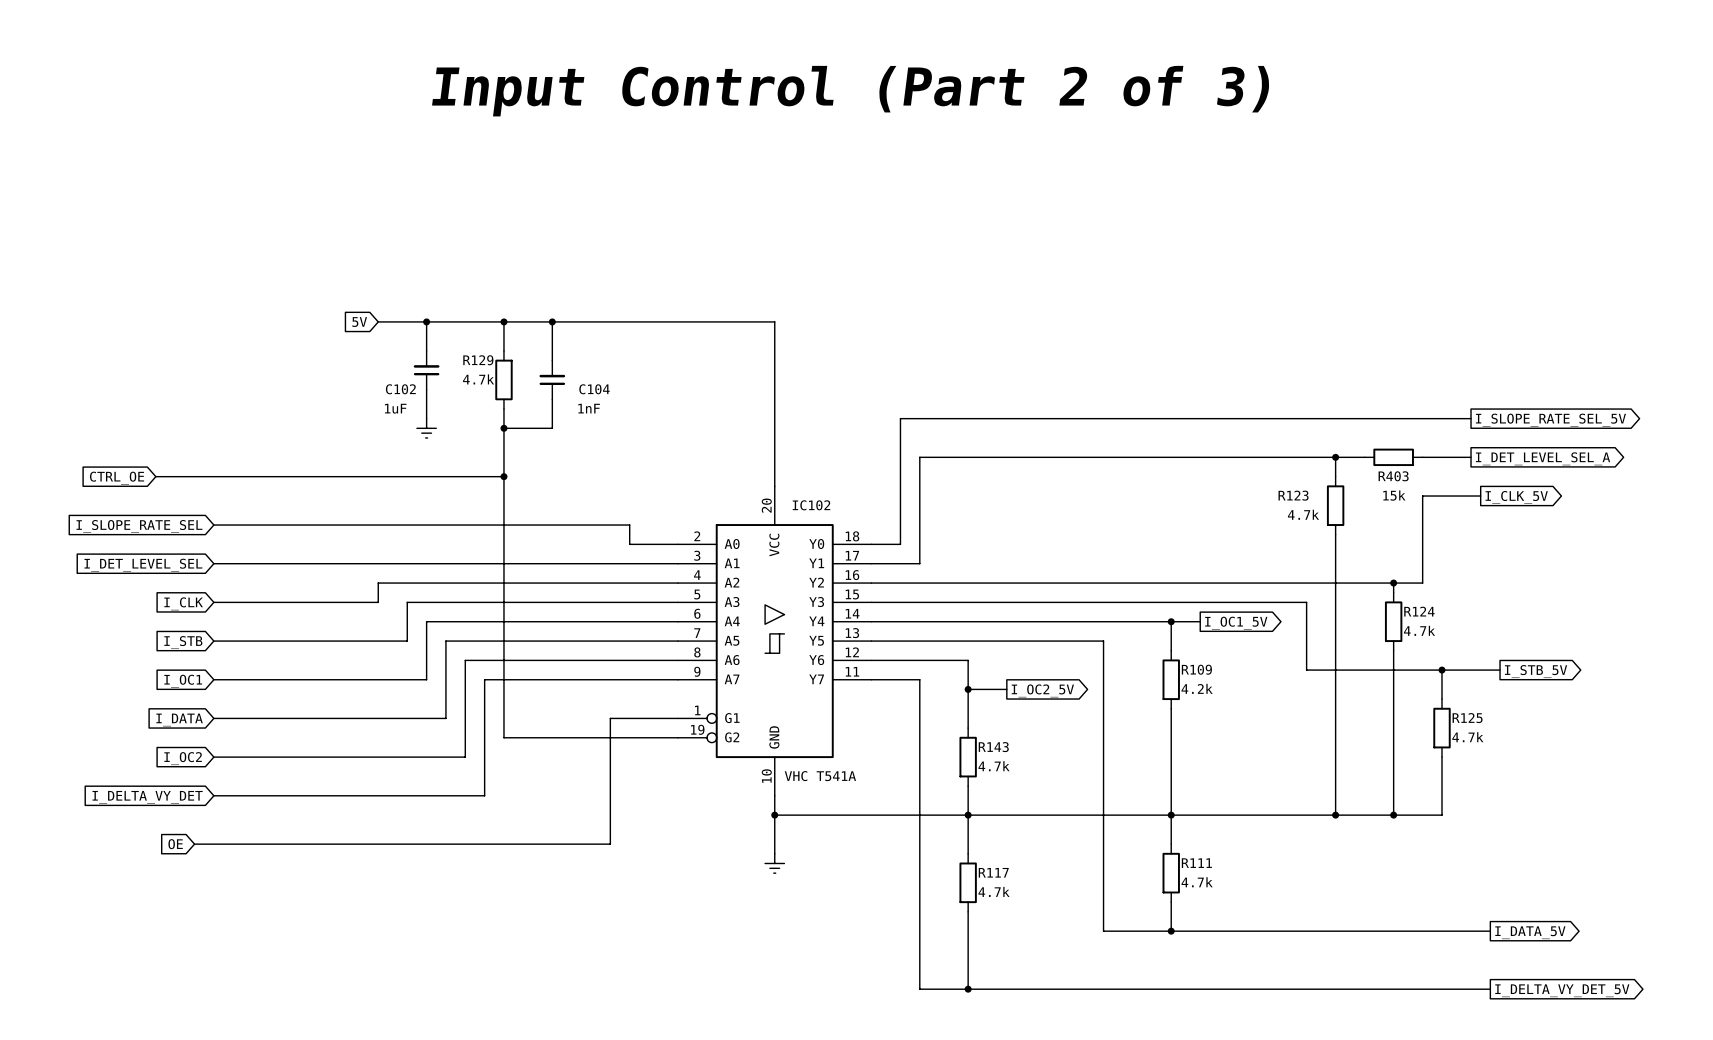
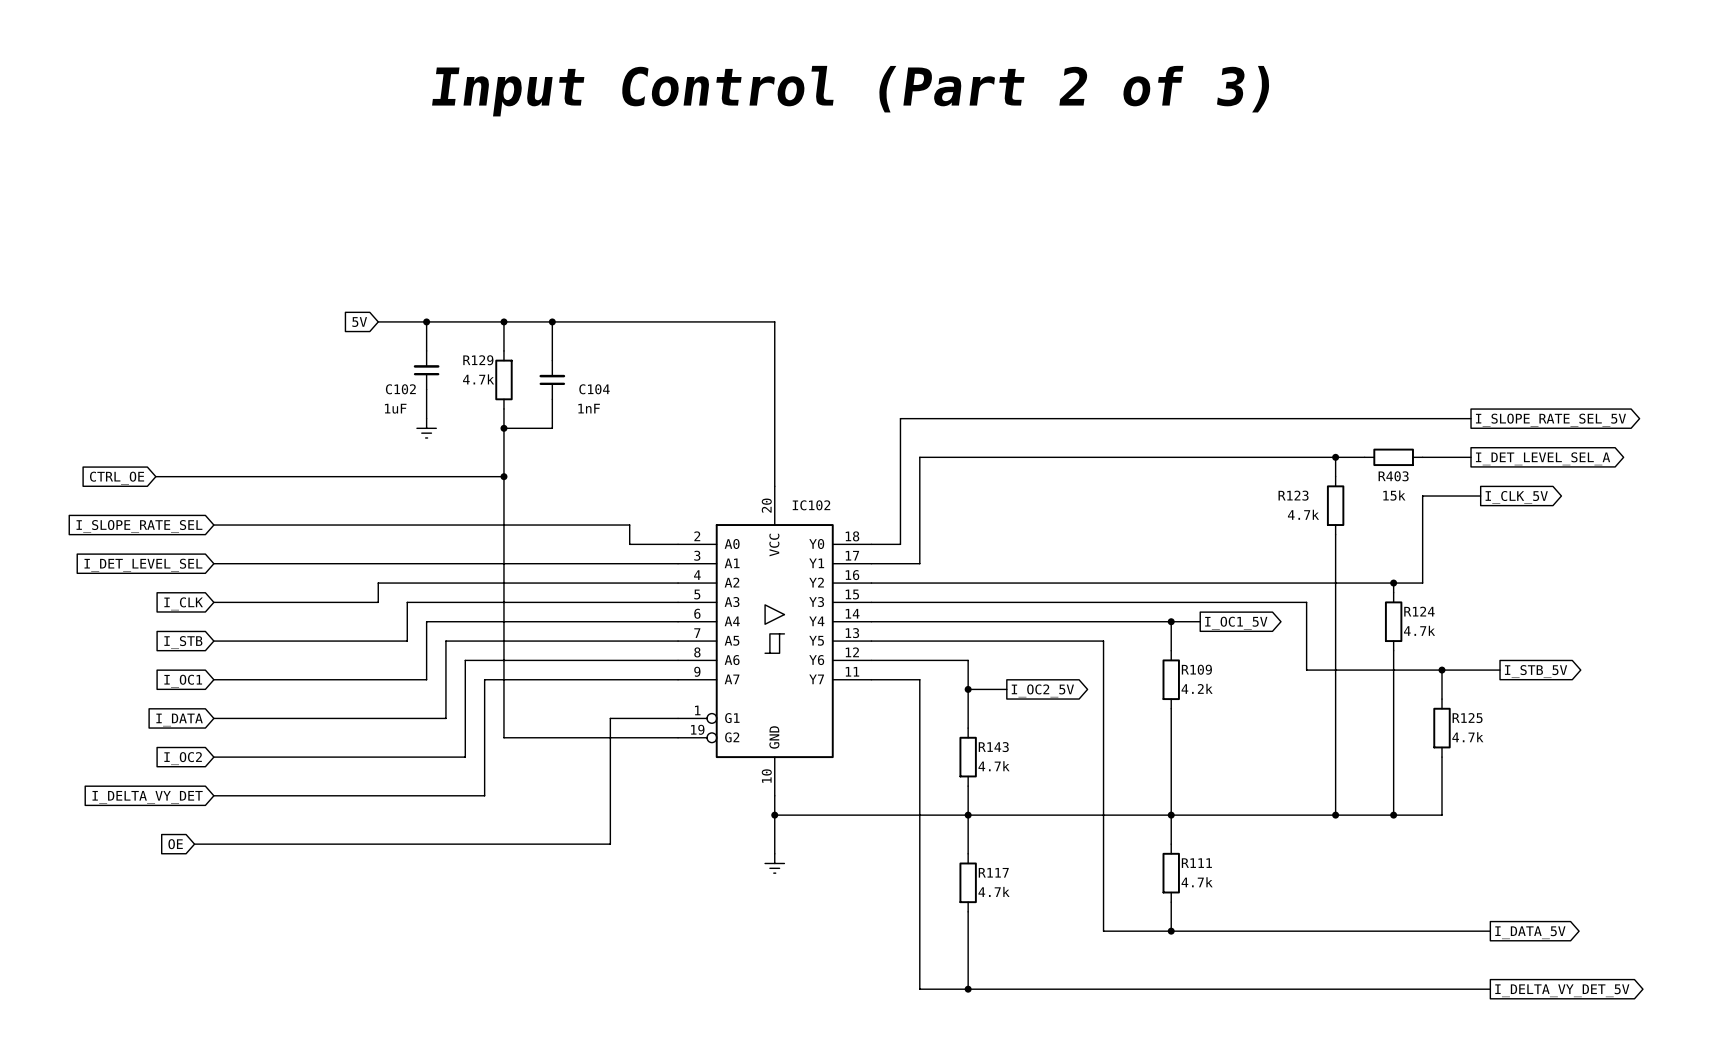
IC102 value: VHC T541A (820, 776) -> none

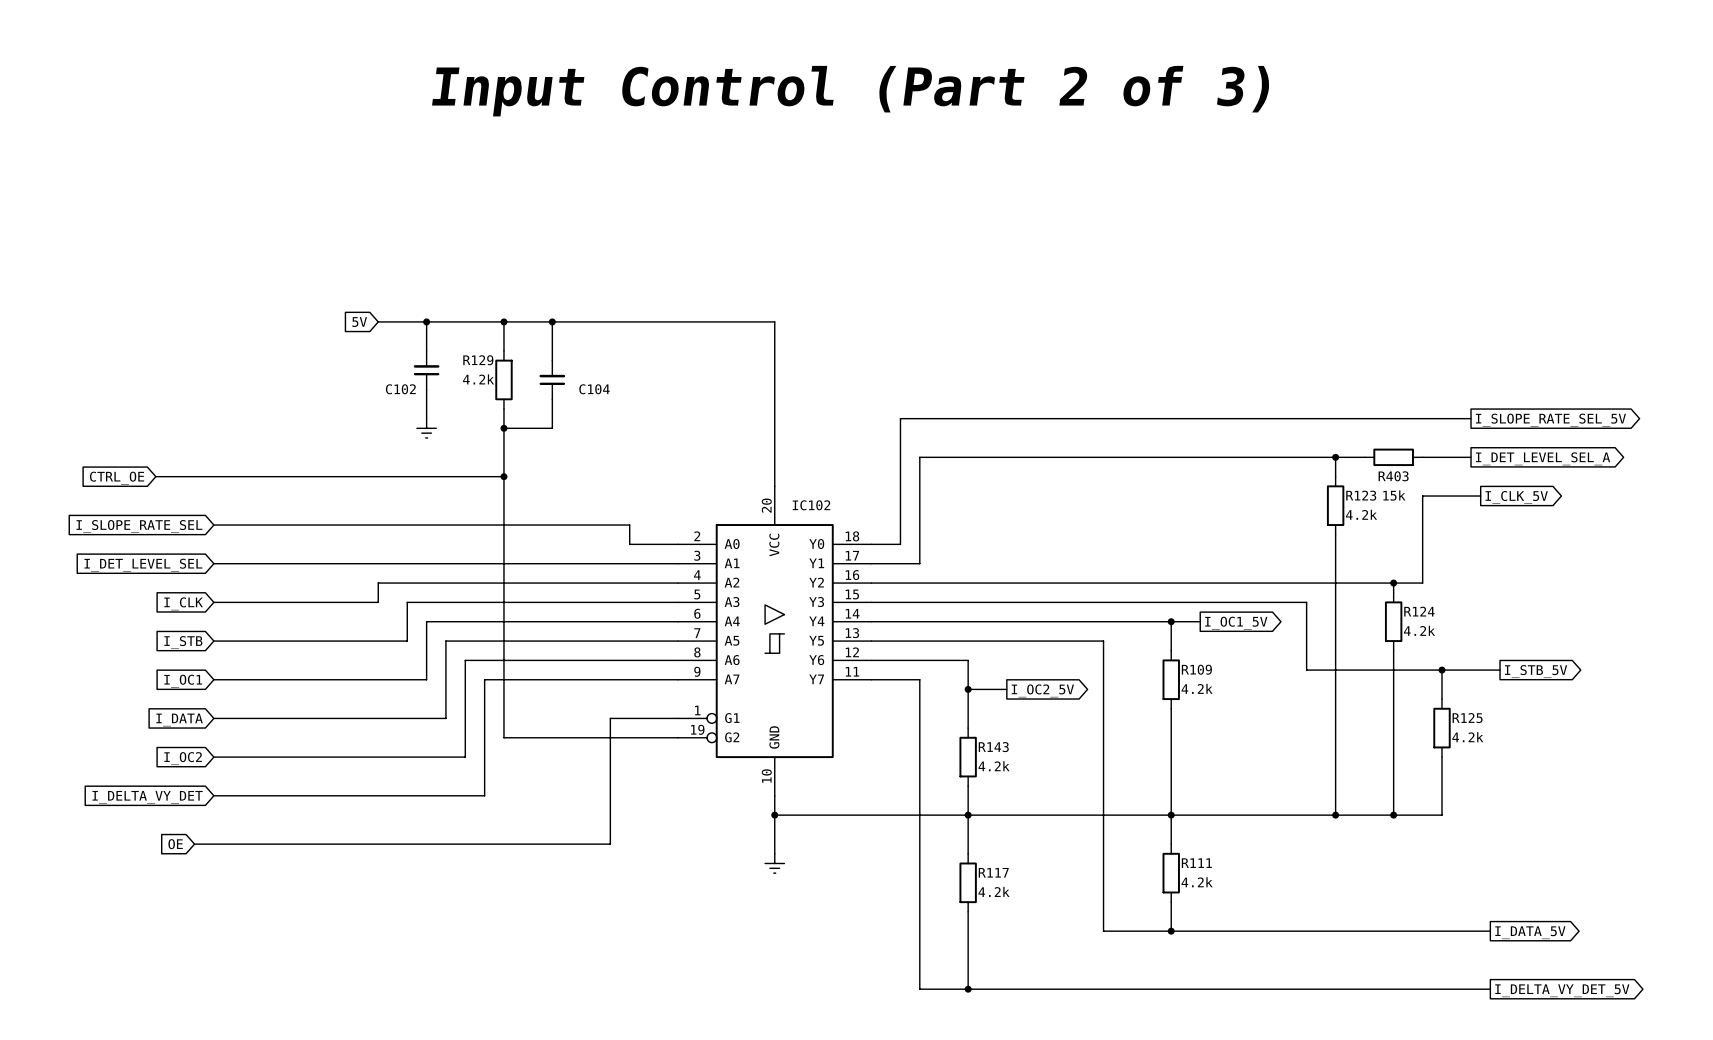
R129 value: 4.7k (478, 379) -> 4.2k (478, 379)
C102 value: 1uF (395, 408) -> none
C104 value: 1nF (589, 408) -> none
R123 name position: R123 (1293, 495) -> R123 (1361, 495)
R123 value: 4.7k (1303, 514) -> 4.2k (1361, 514)
R124 value: 4.7k (1419, 630) -> 4.2k (1419, 630)
R125 value: 4.7k (1467, 737) -> 4.2k (1467, 737)
R143 value: 4.7k (994, 766) -> 4.2k (994, 766)
R111 value: 4.7k (1197, 882) -> 4.2k (1197, 882)
R117 value: 4.7k (994, 891) -> 4.2k (994, 891)

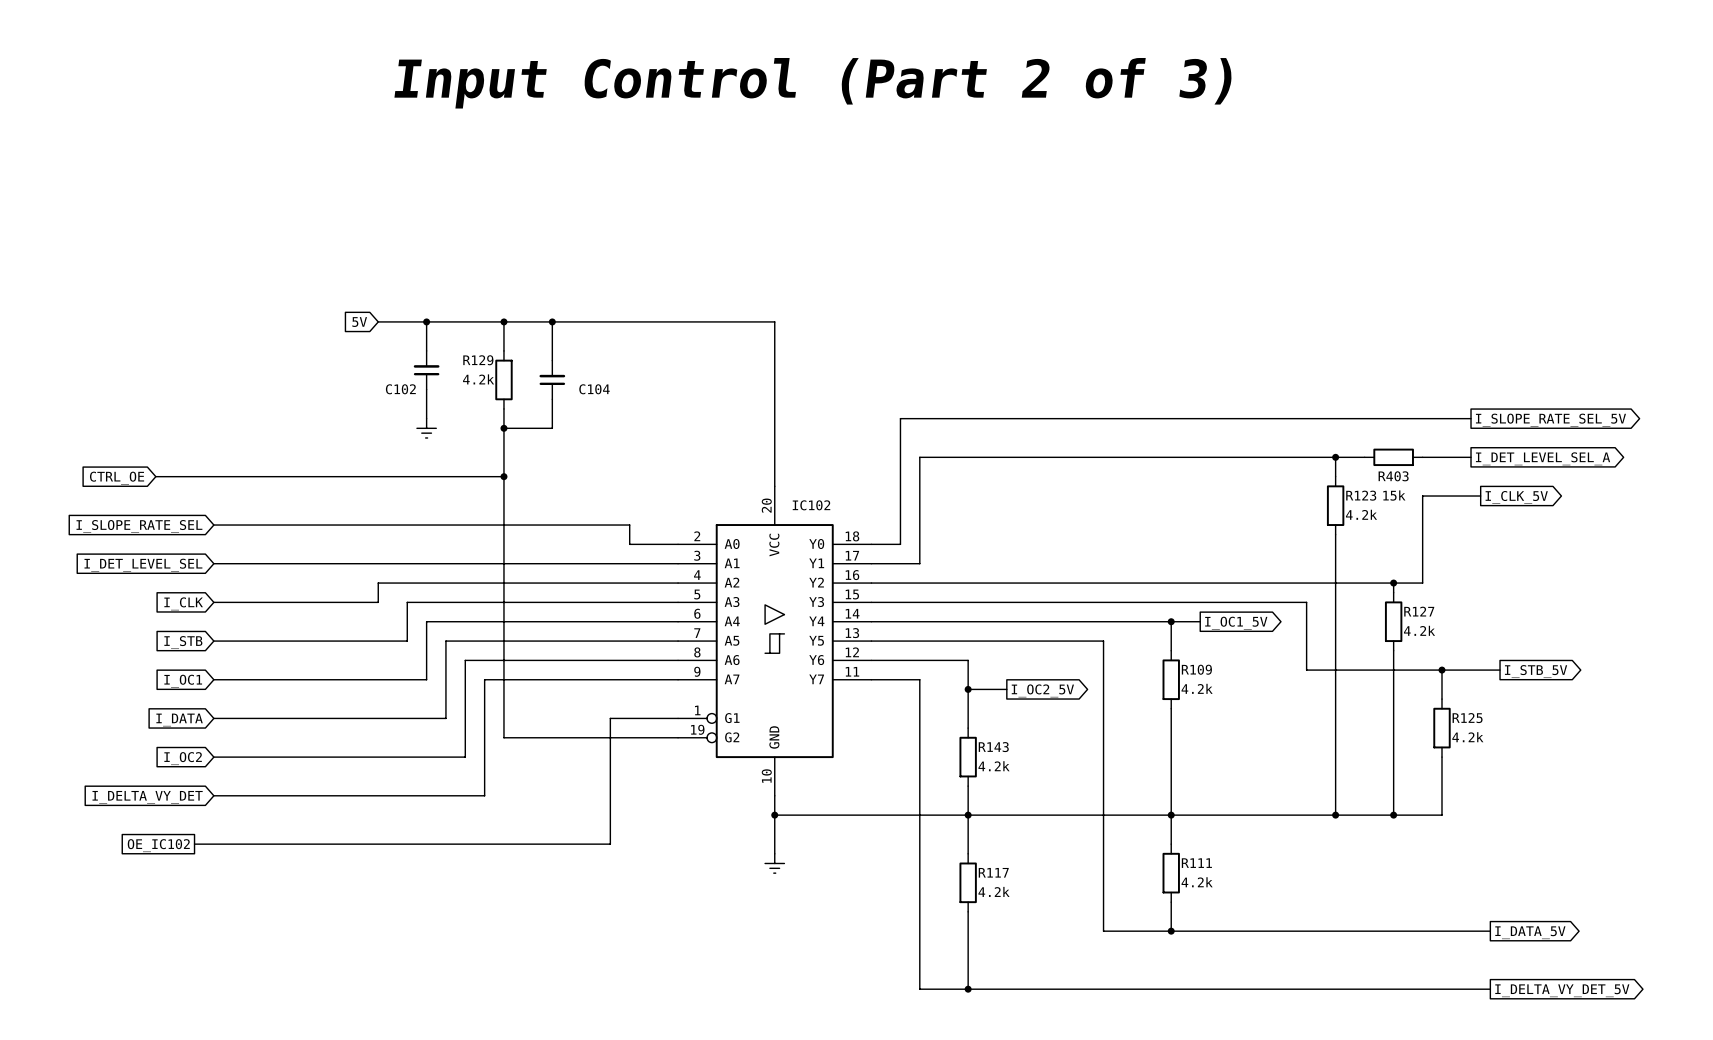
label: none -> Input Control (Part 2 of 3) (813, 83)
text: Input Control (Part 2 of 3) (850, 91) -> none
R124 name: R124 (1419, 611) -> R127 (1419, 611)
global label shape: input (175, 844) -> passive (158, 845)
global label: OE (175, 844) -> OE_IC102 (158, 845)

